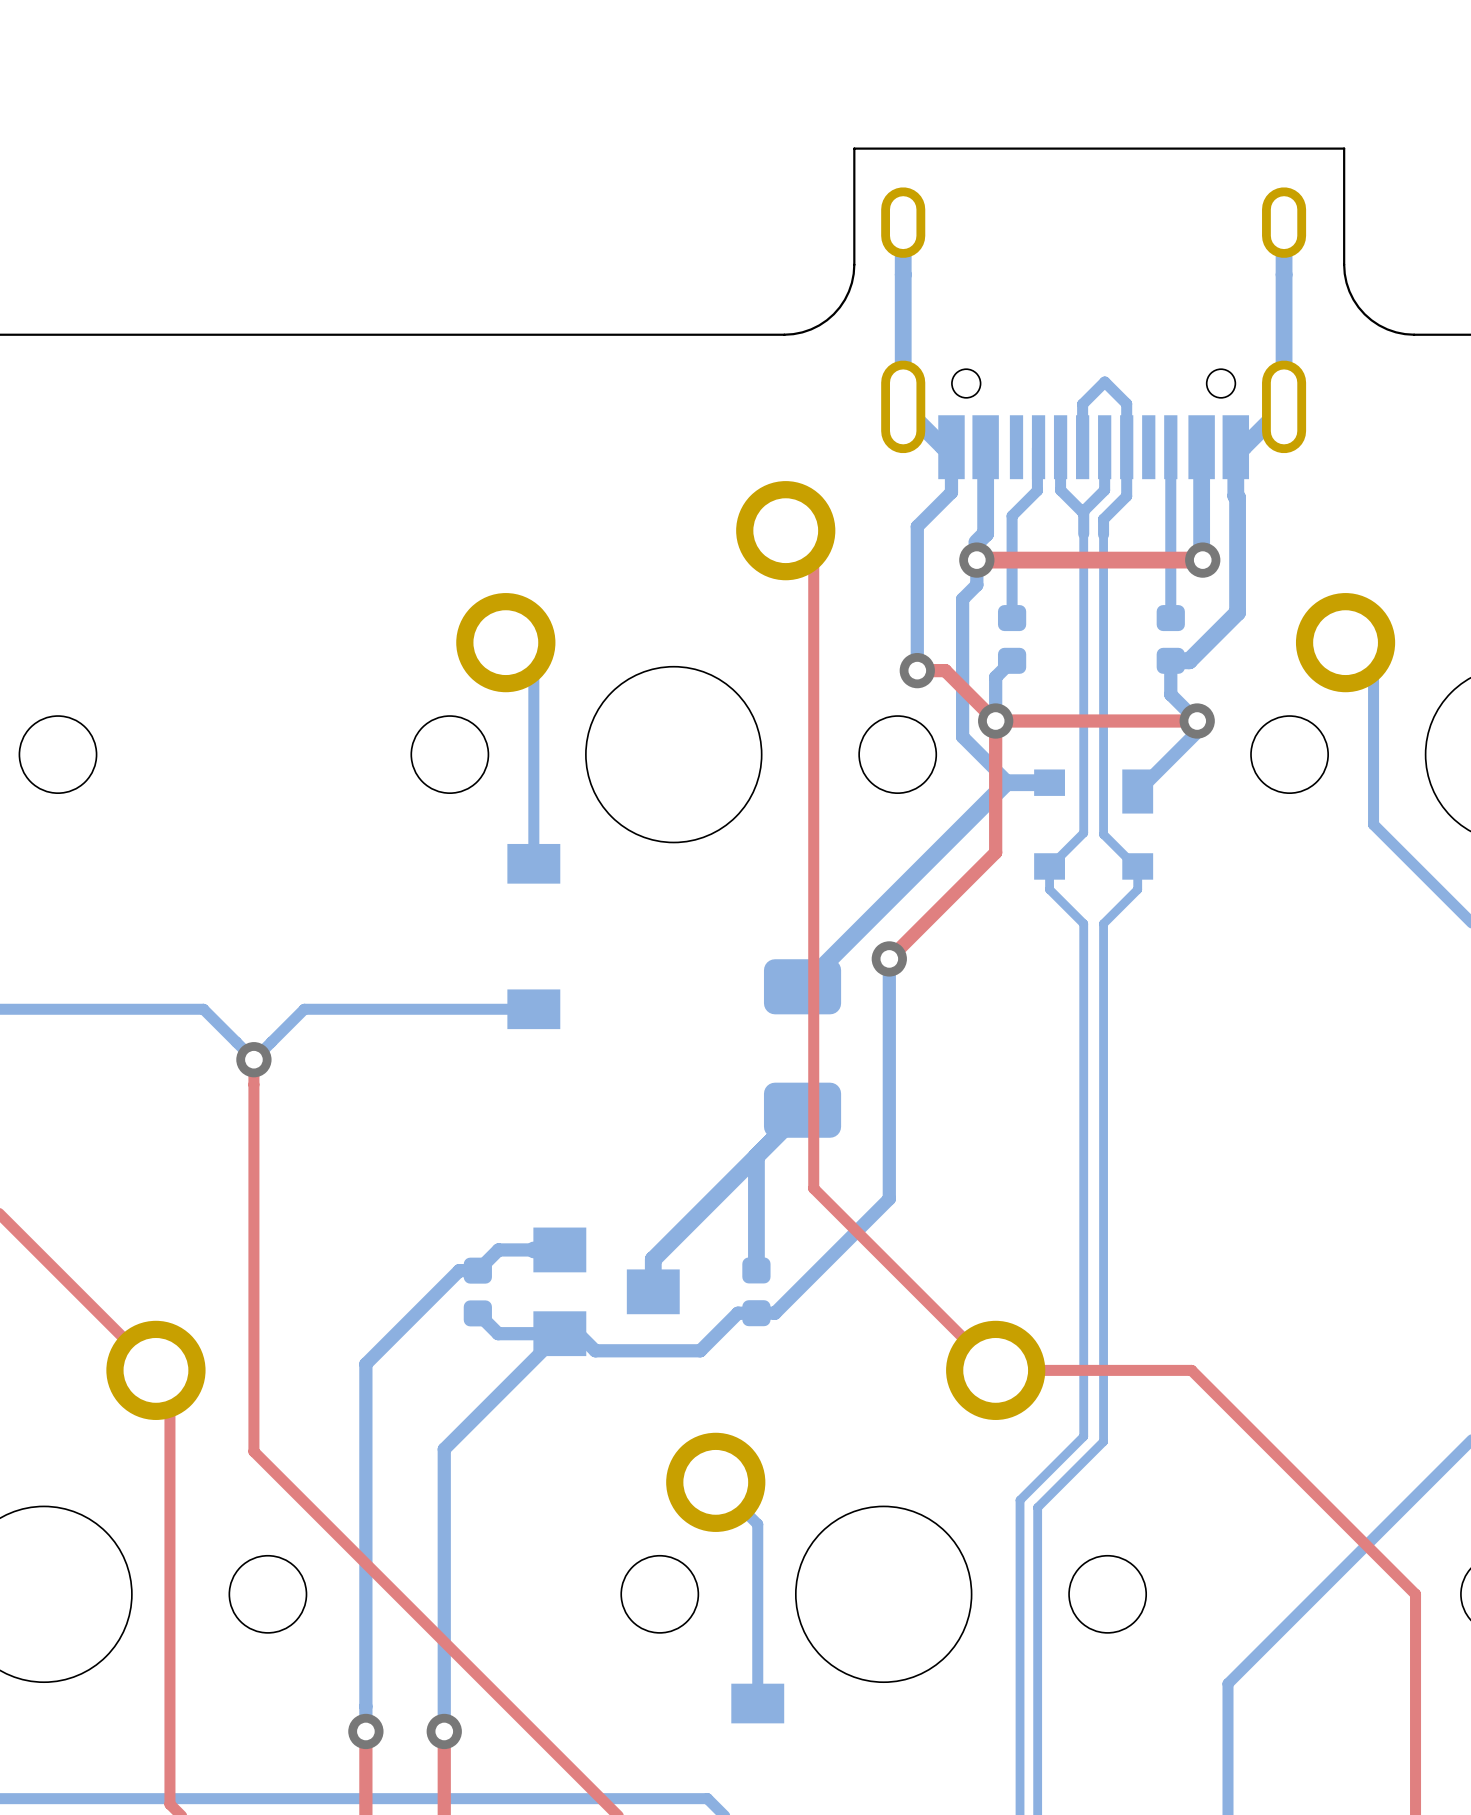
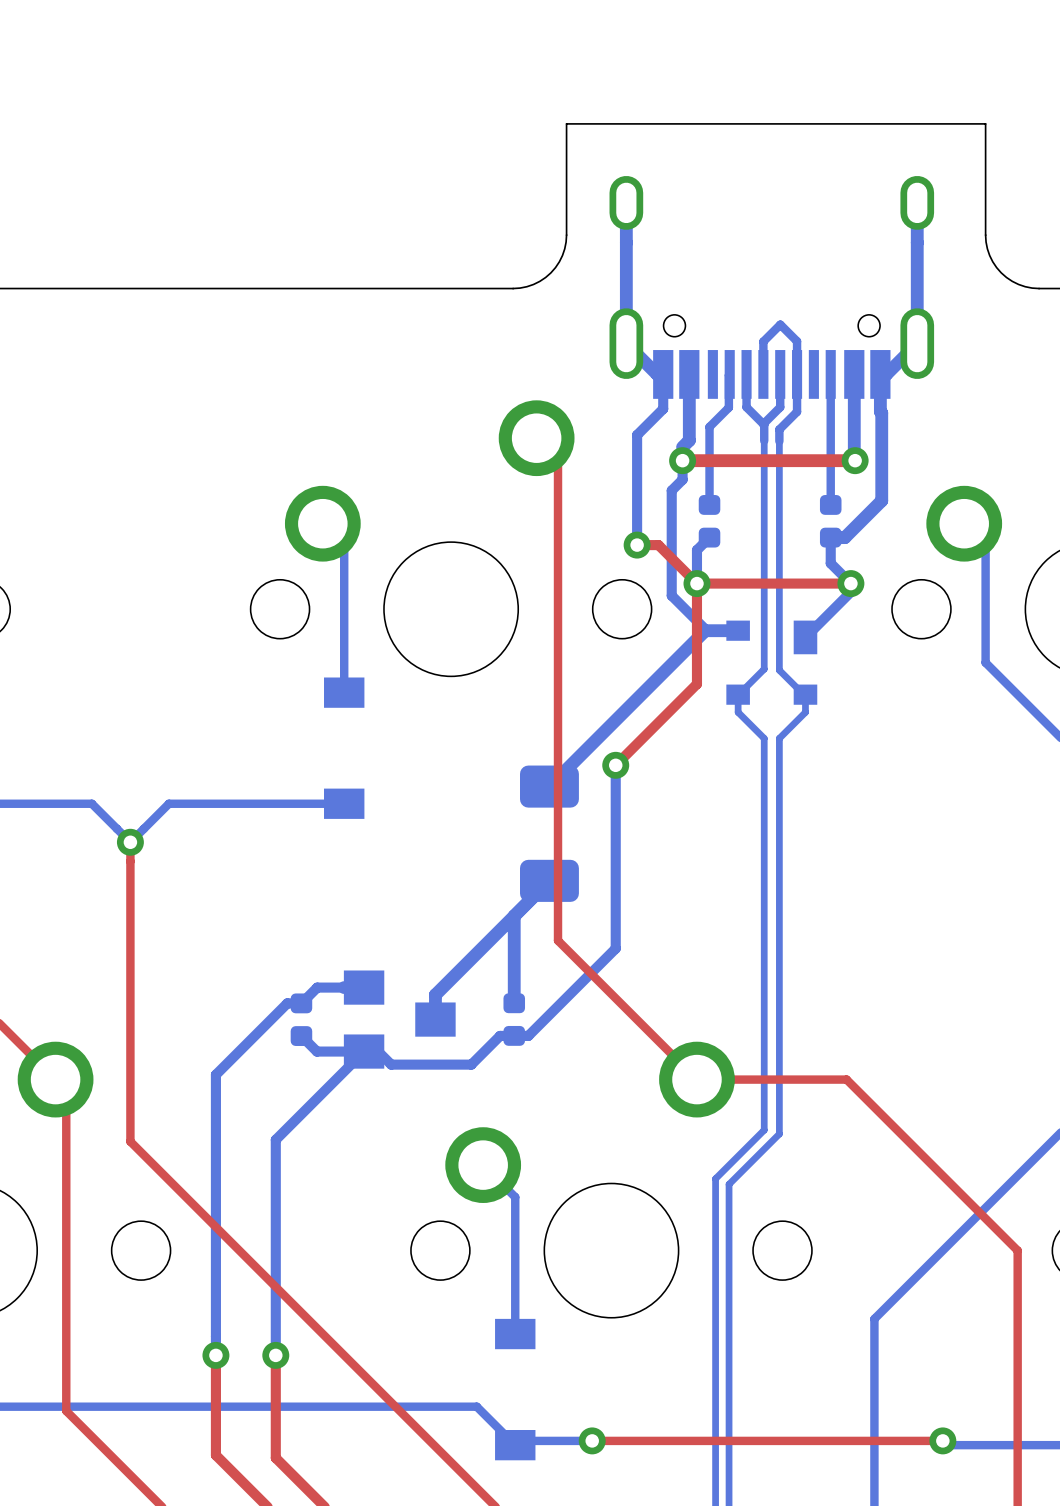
board edge: (754, 334) (793, 334) (811, 329) (826, 320) (844, 299) (851, 282) (854, 264) (854, 148) (1344, 148) (1344, 264) (1346, 282) (1353, 299) (1371, 320) (1387, 329) (1405, 334) (1443, 334) -> (513, 288) (526, 286) (545, 277) (555, 267) (564, 248) (566, 235) (566, 123) (985, 123) (985, 235) (987, 248) (992, 261) (1006, 277) (1025, 286) (1039, 288)

